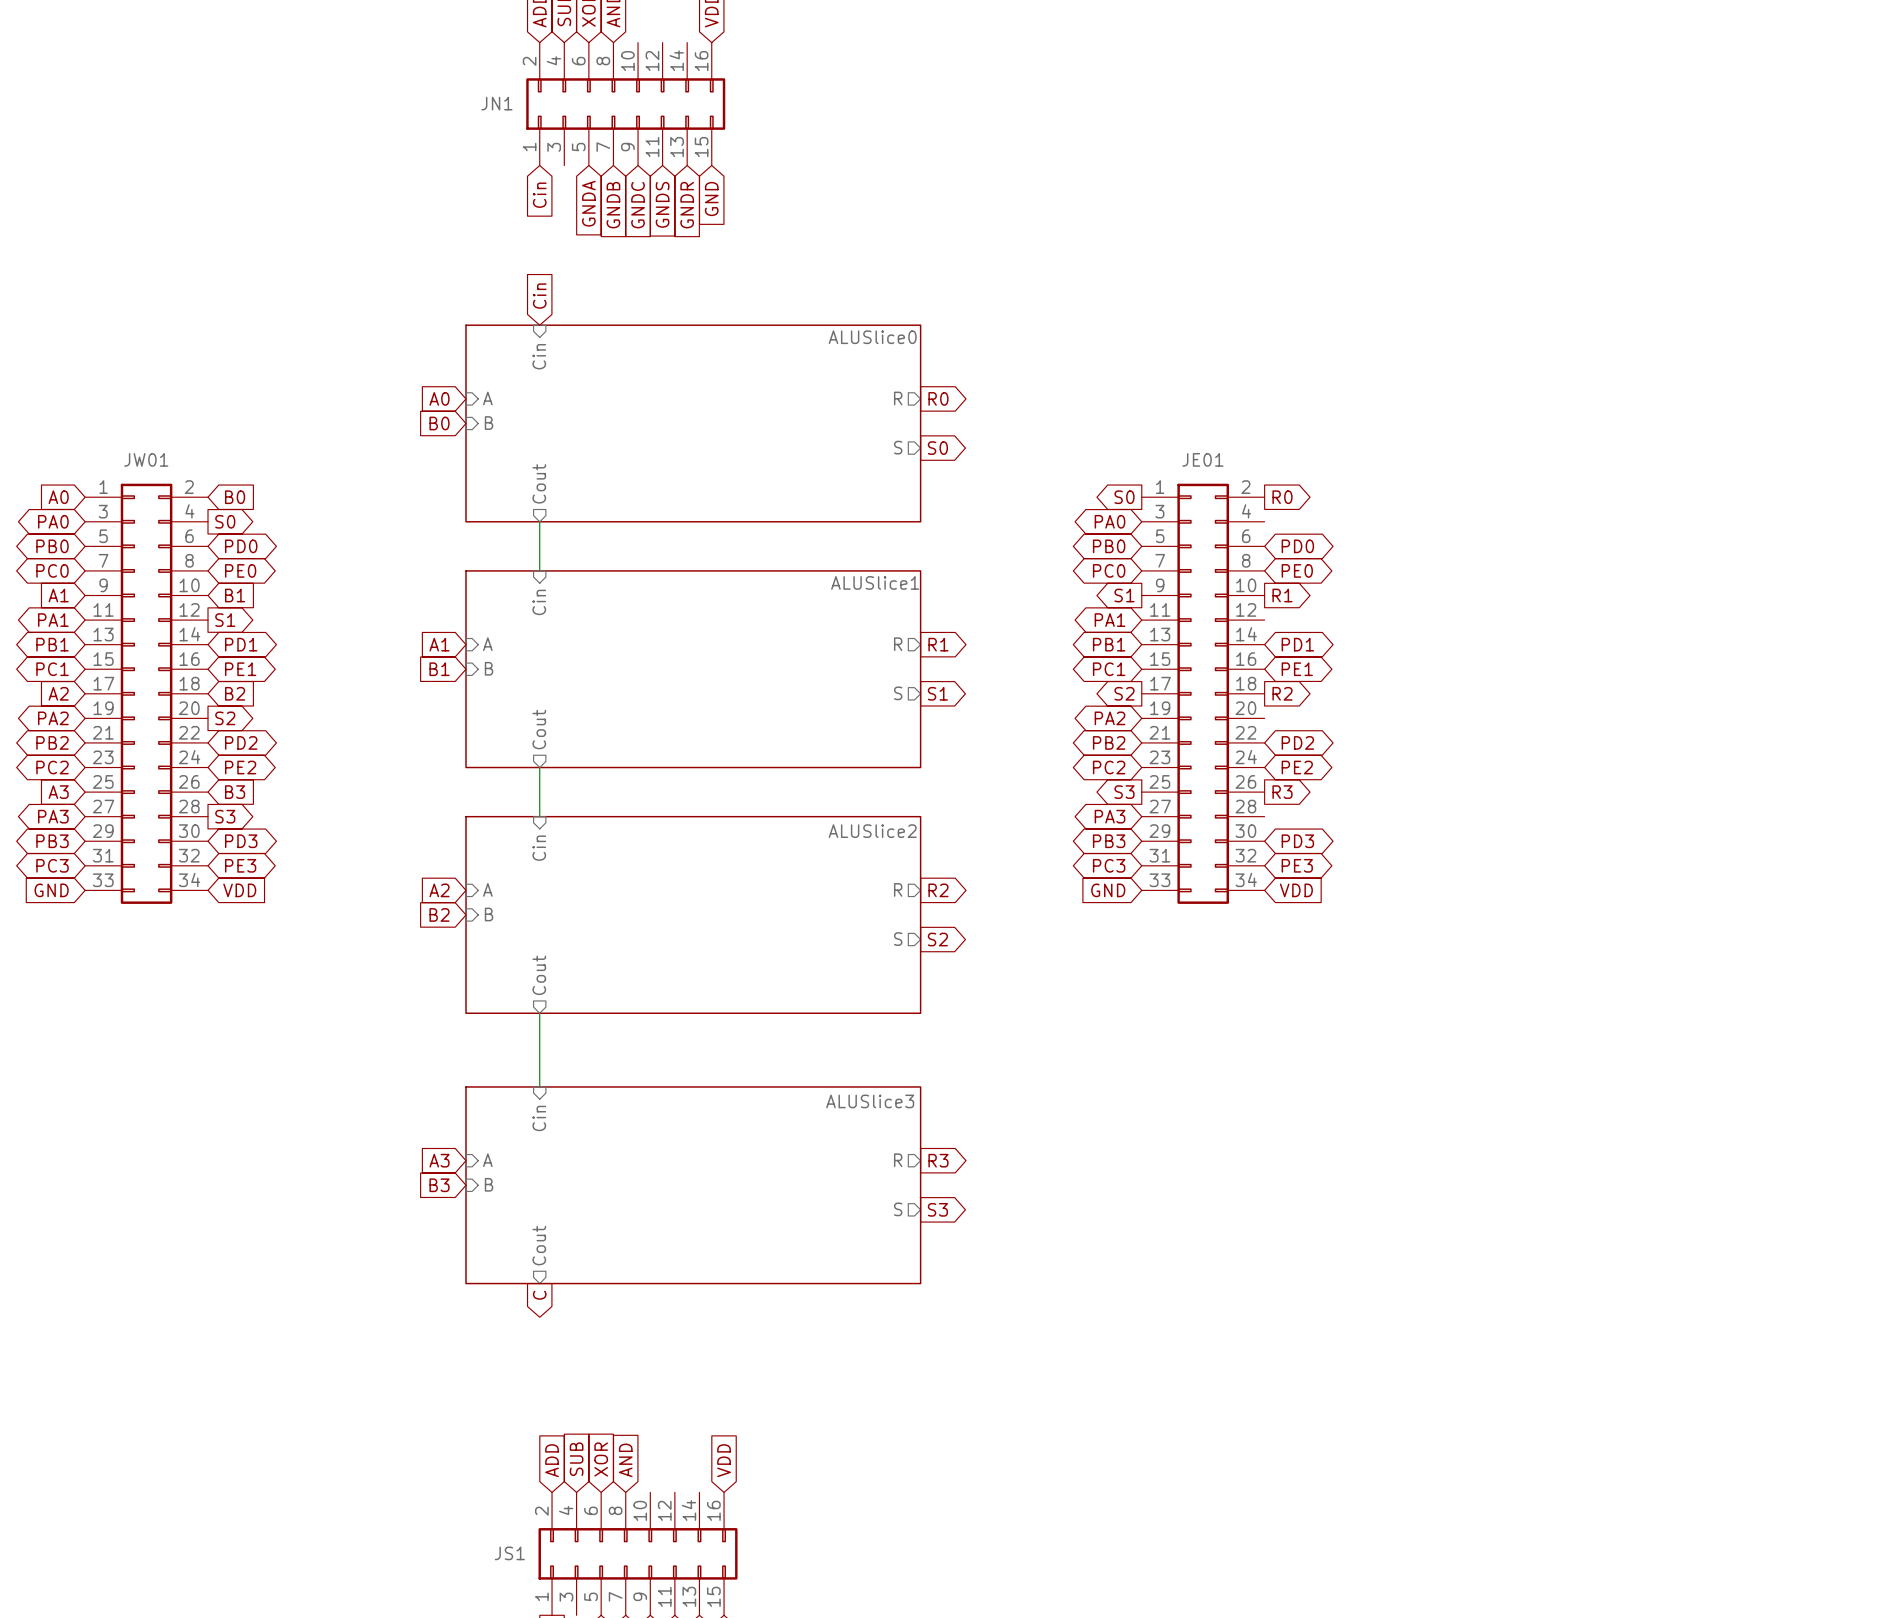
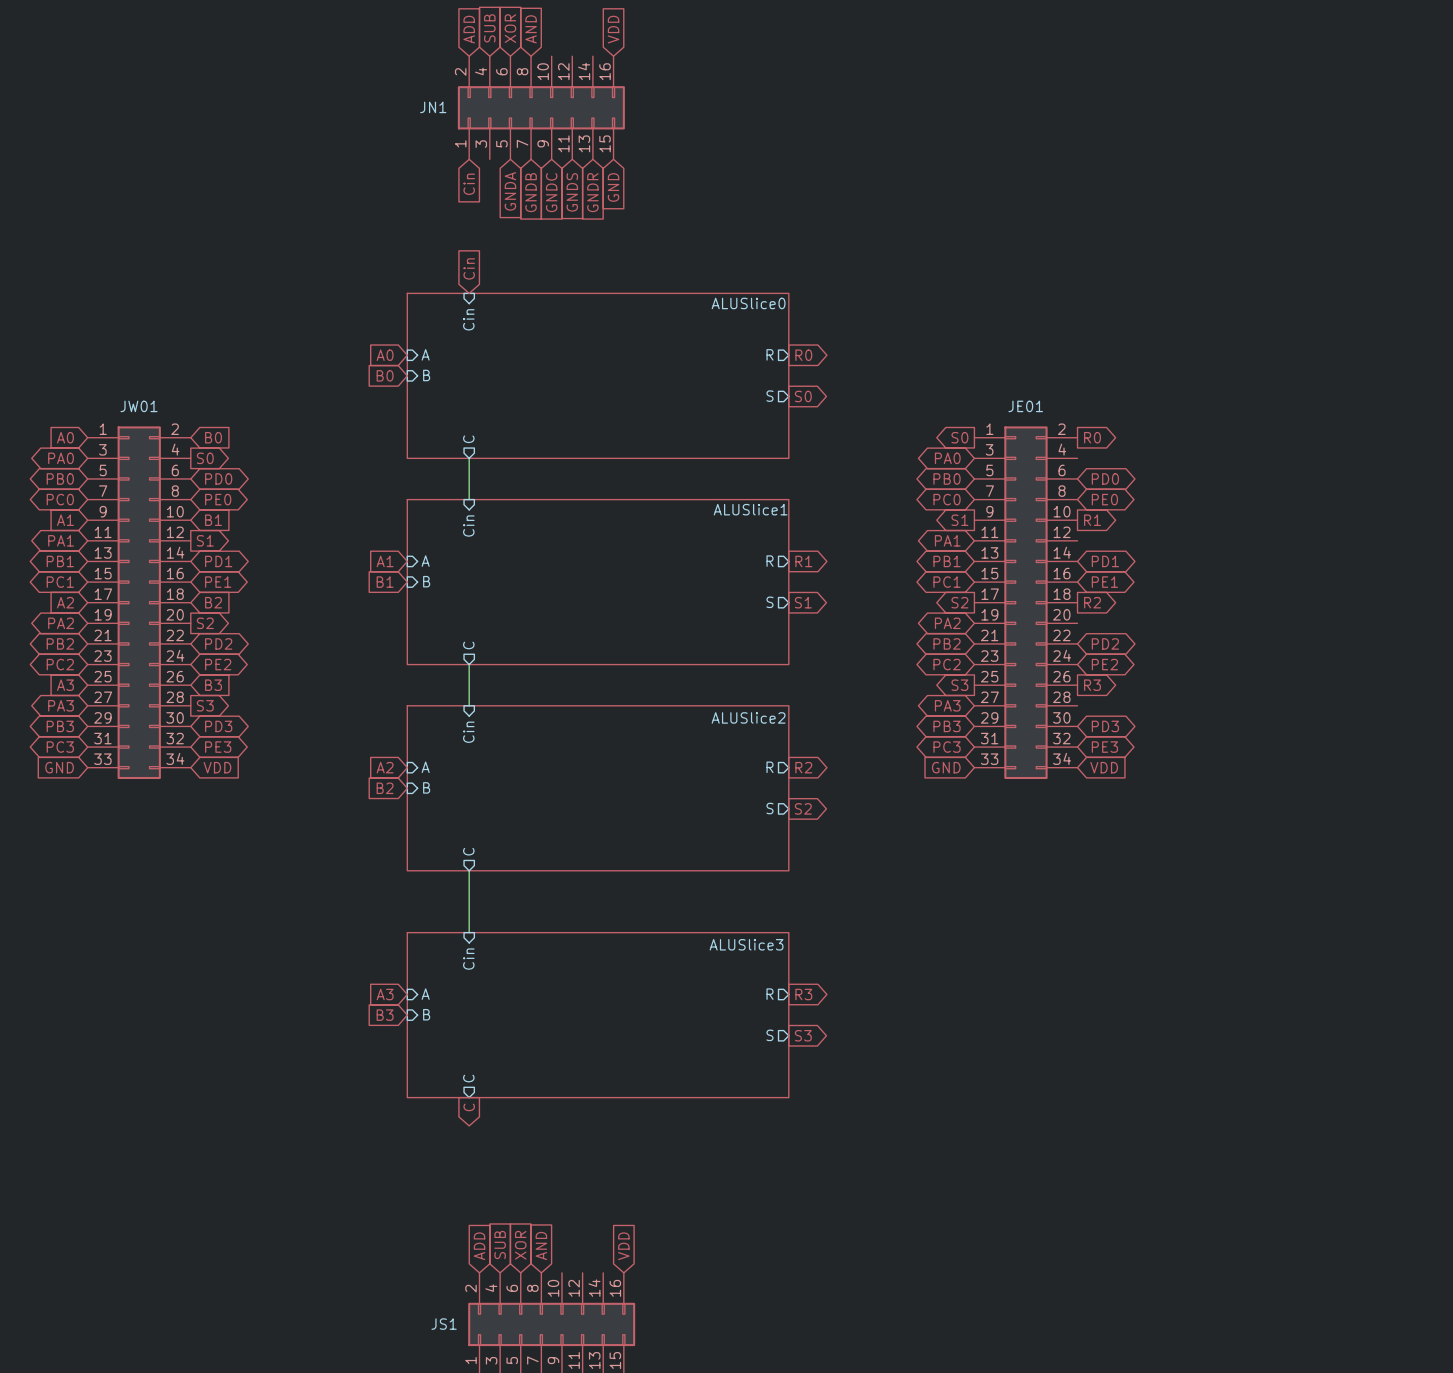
sheet pin: Cout (539, 483) -> C (468, 439)
sheet pin: Cout (539, 729) -> C (468, 645)
sheet pin: Cout (539, 975) -> C (468, 851)
sheet pin: Cout (539, 1245) -> C (468, 1078)

